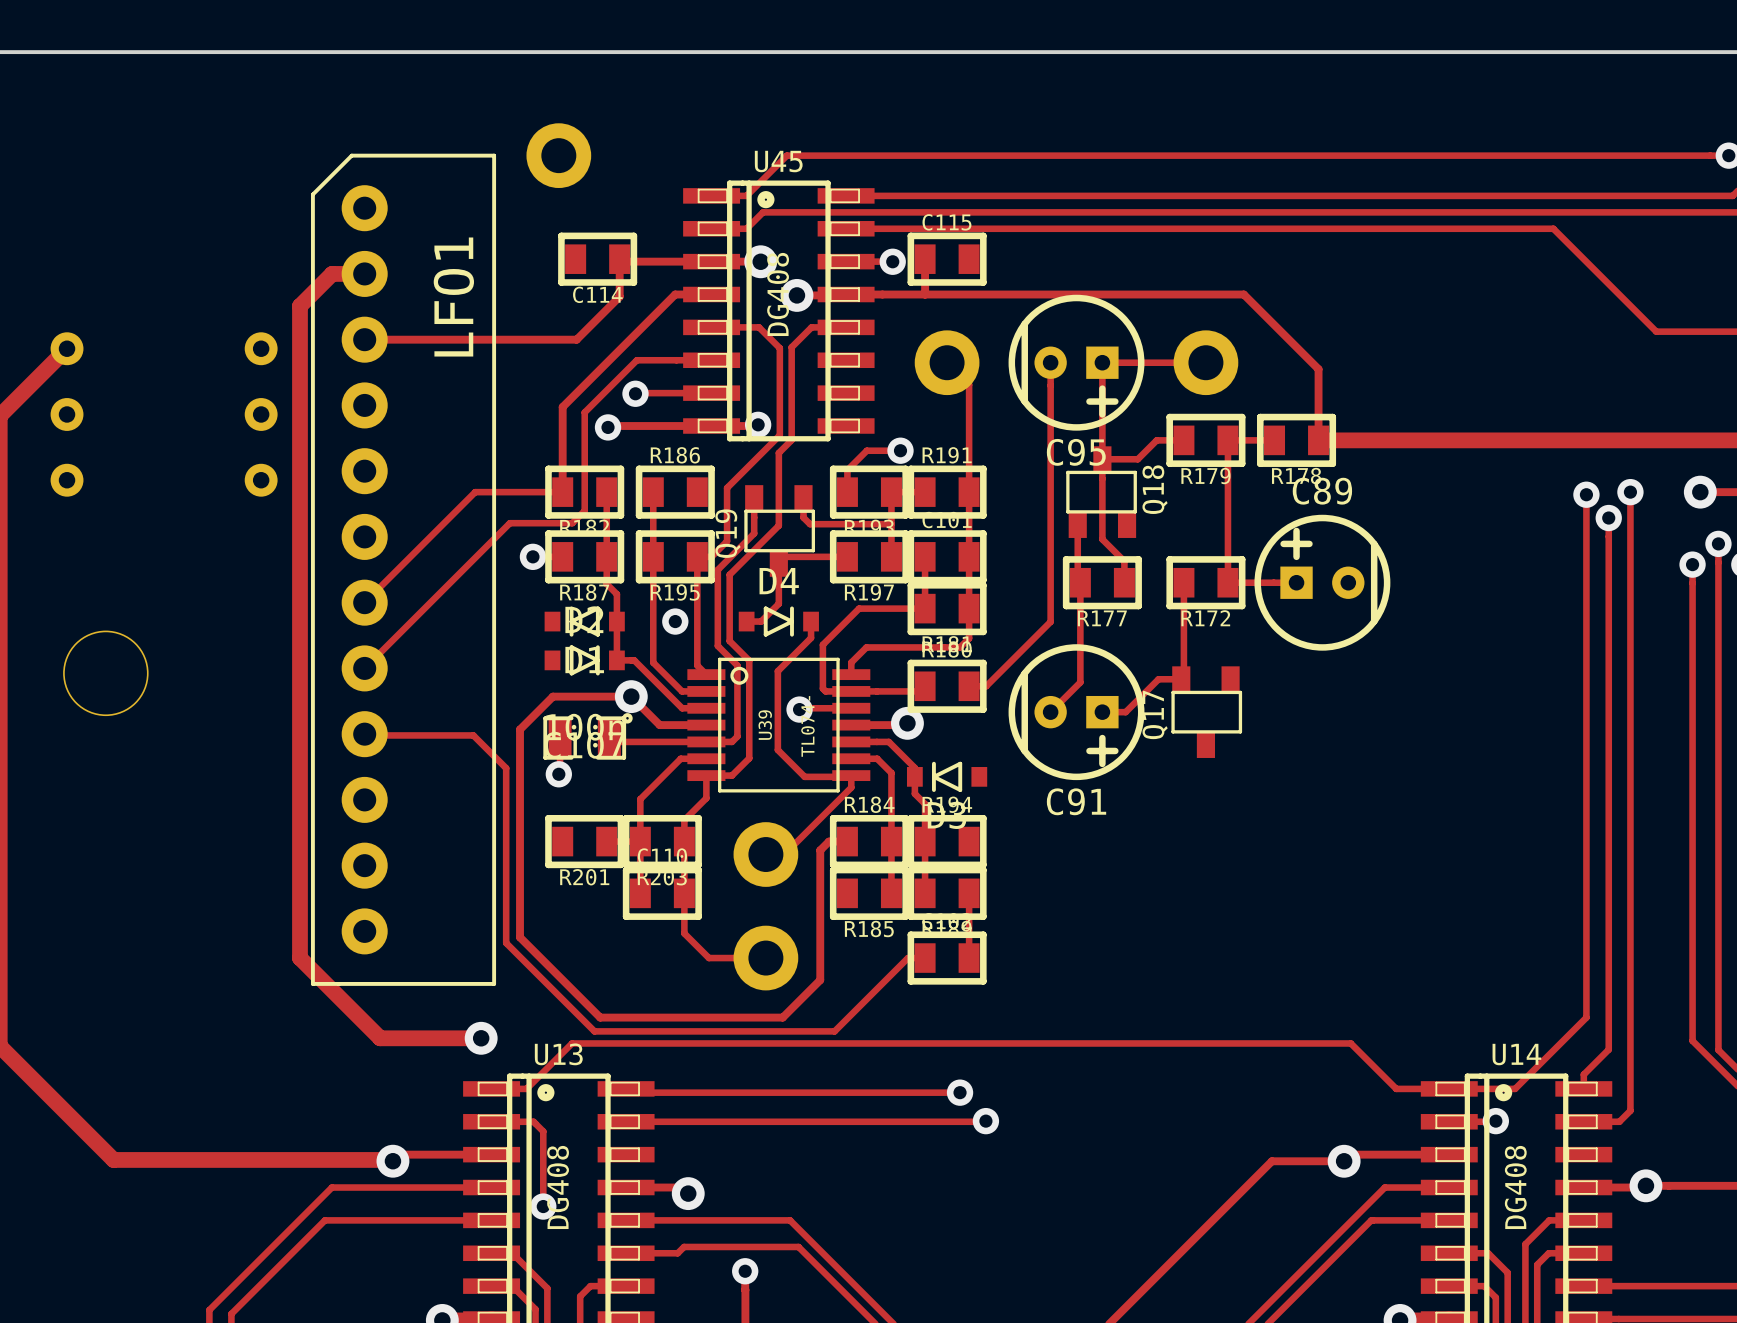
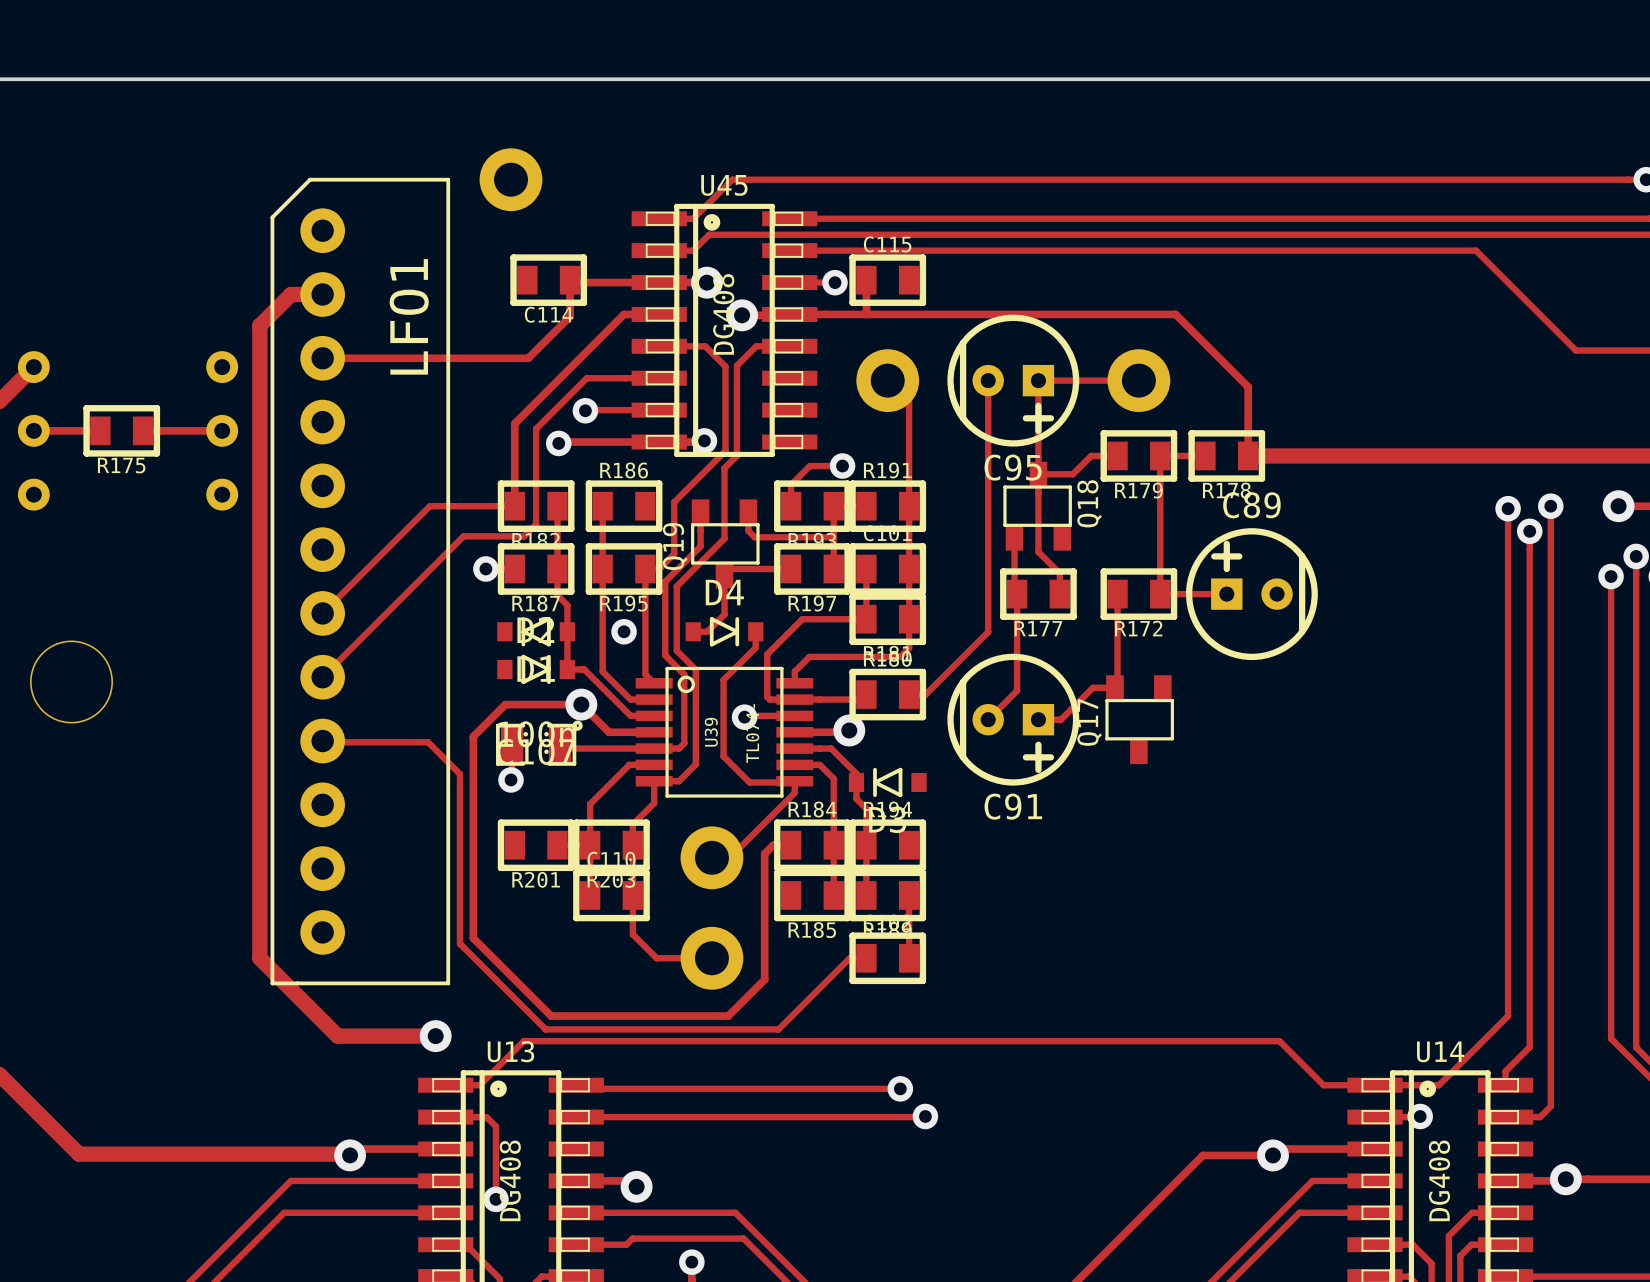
track: none -> (33, 430) (100, 430)
R175: none -> (121, 430)
track: none -> (143, 430) (222, 430)

